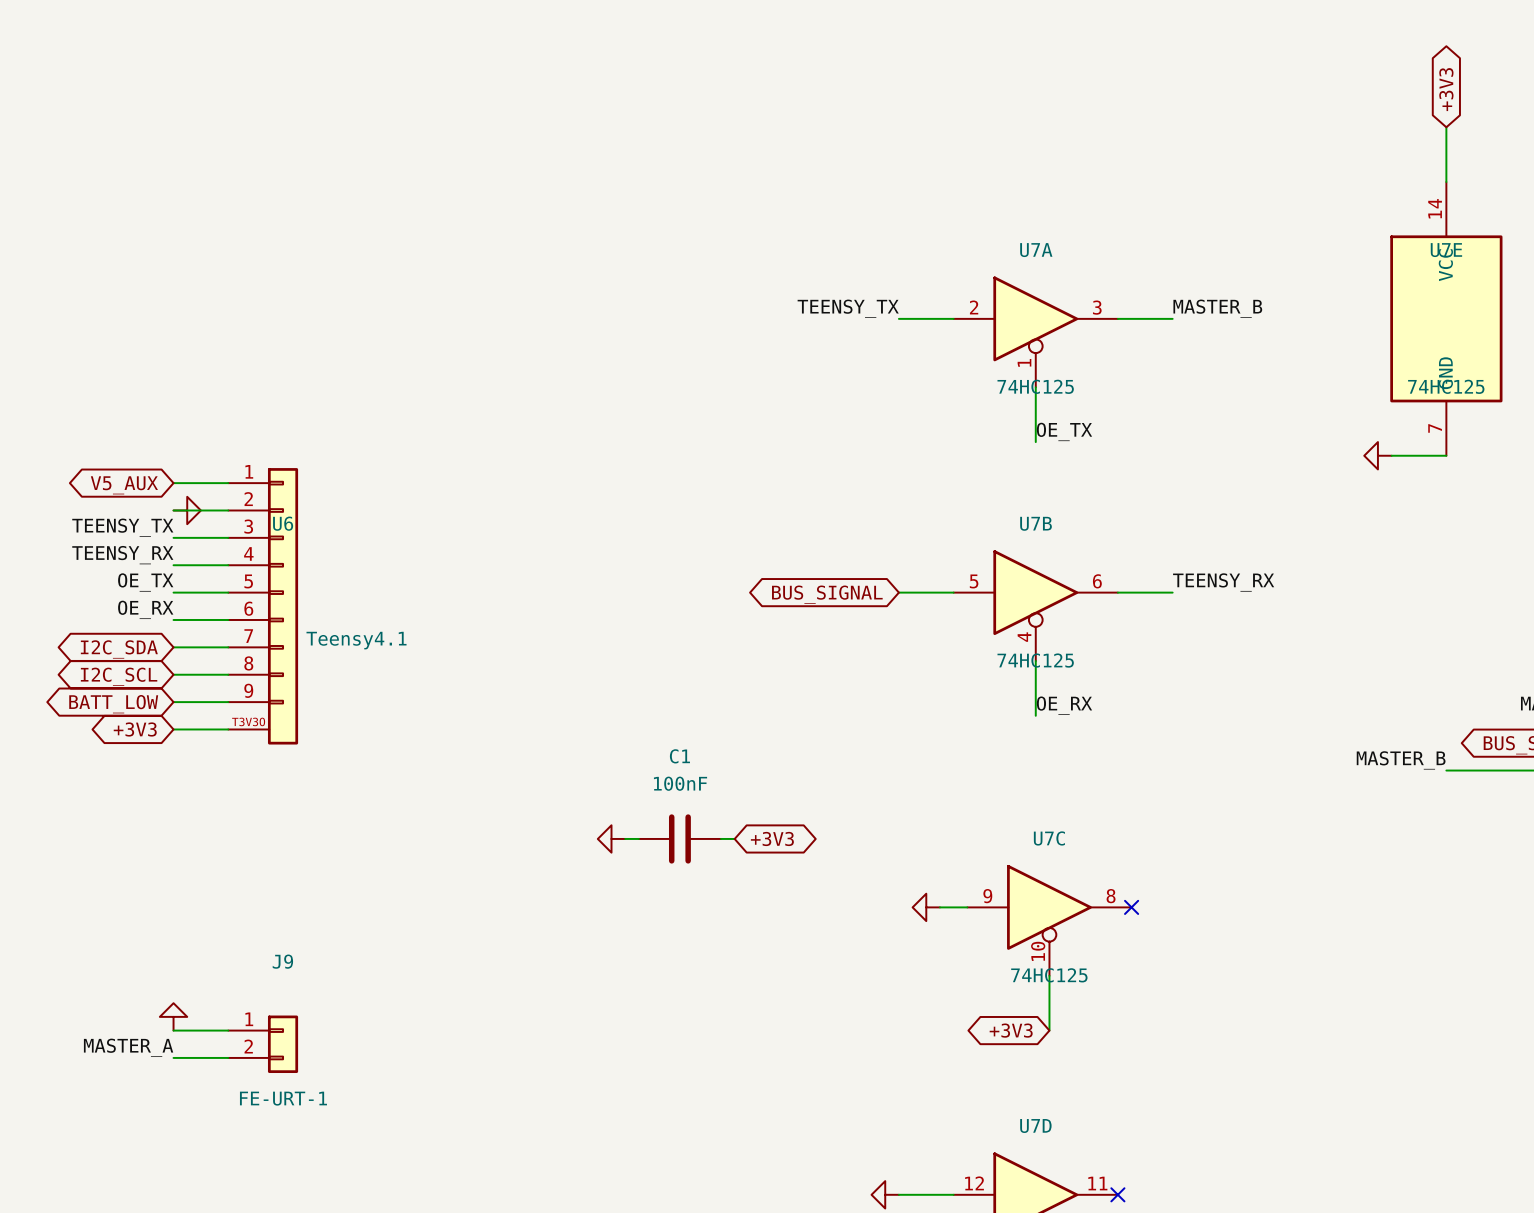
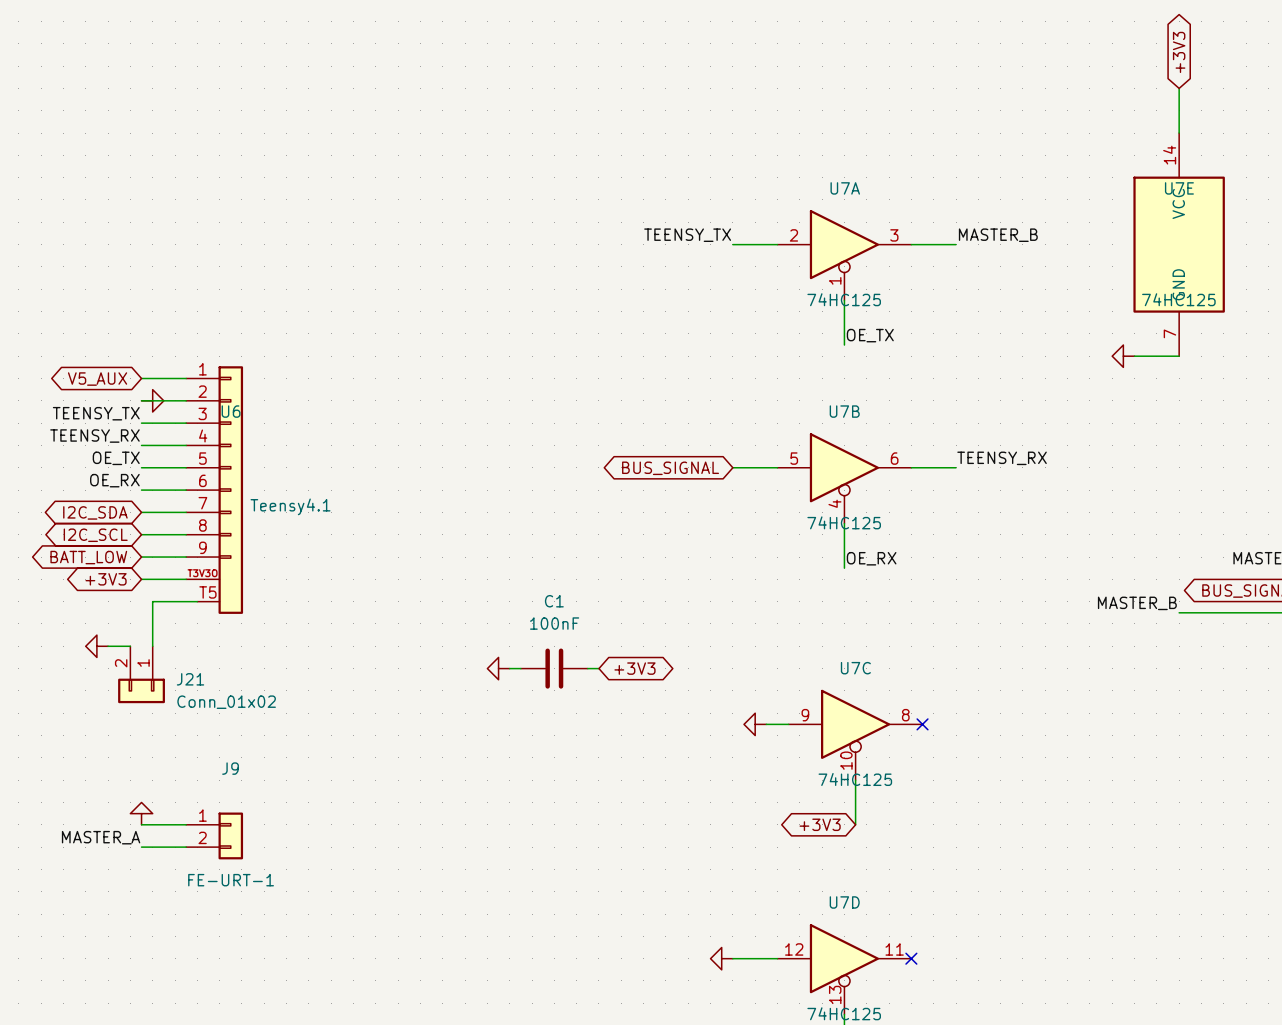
U6 symbol: [228, 468, 299, 745] -> [186, 366, 244, 614]
wire: none -> (197, 601) (152, 601) (152, 646)
power symbol: none -> (96, 646)
wire: none -> (108, 646) (130, 646)
J21: none -> Conn_01x02 (141, 674)

